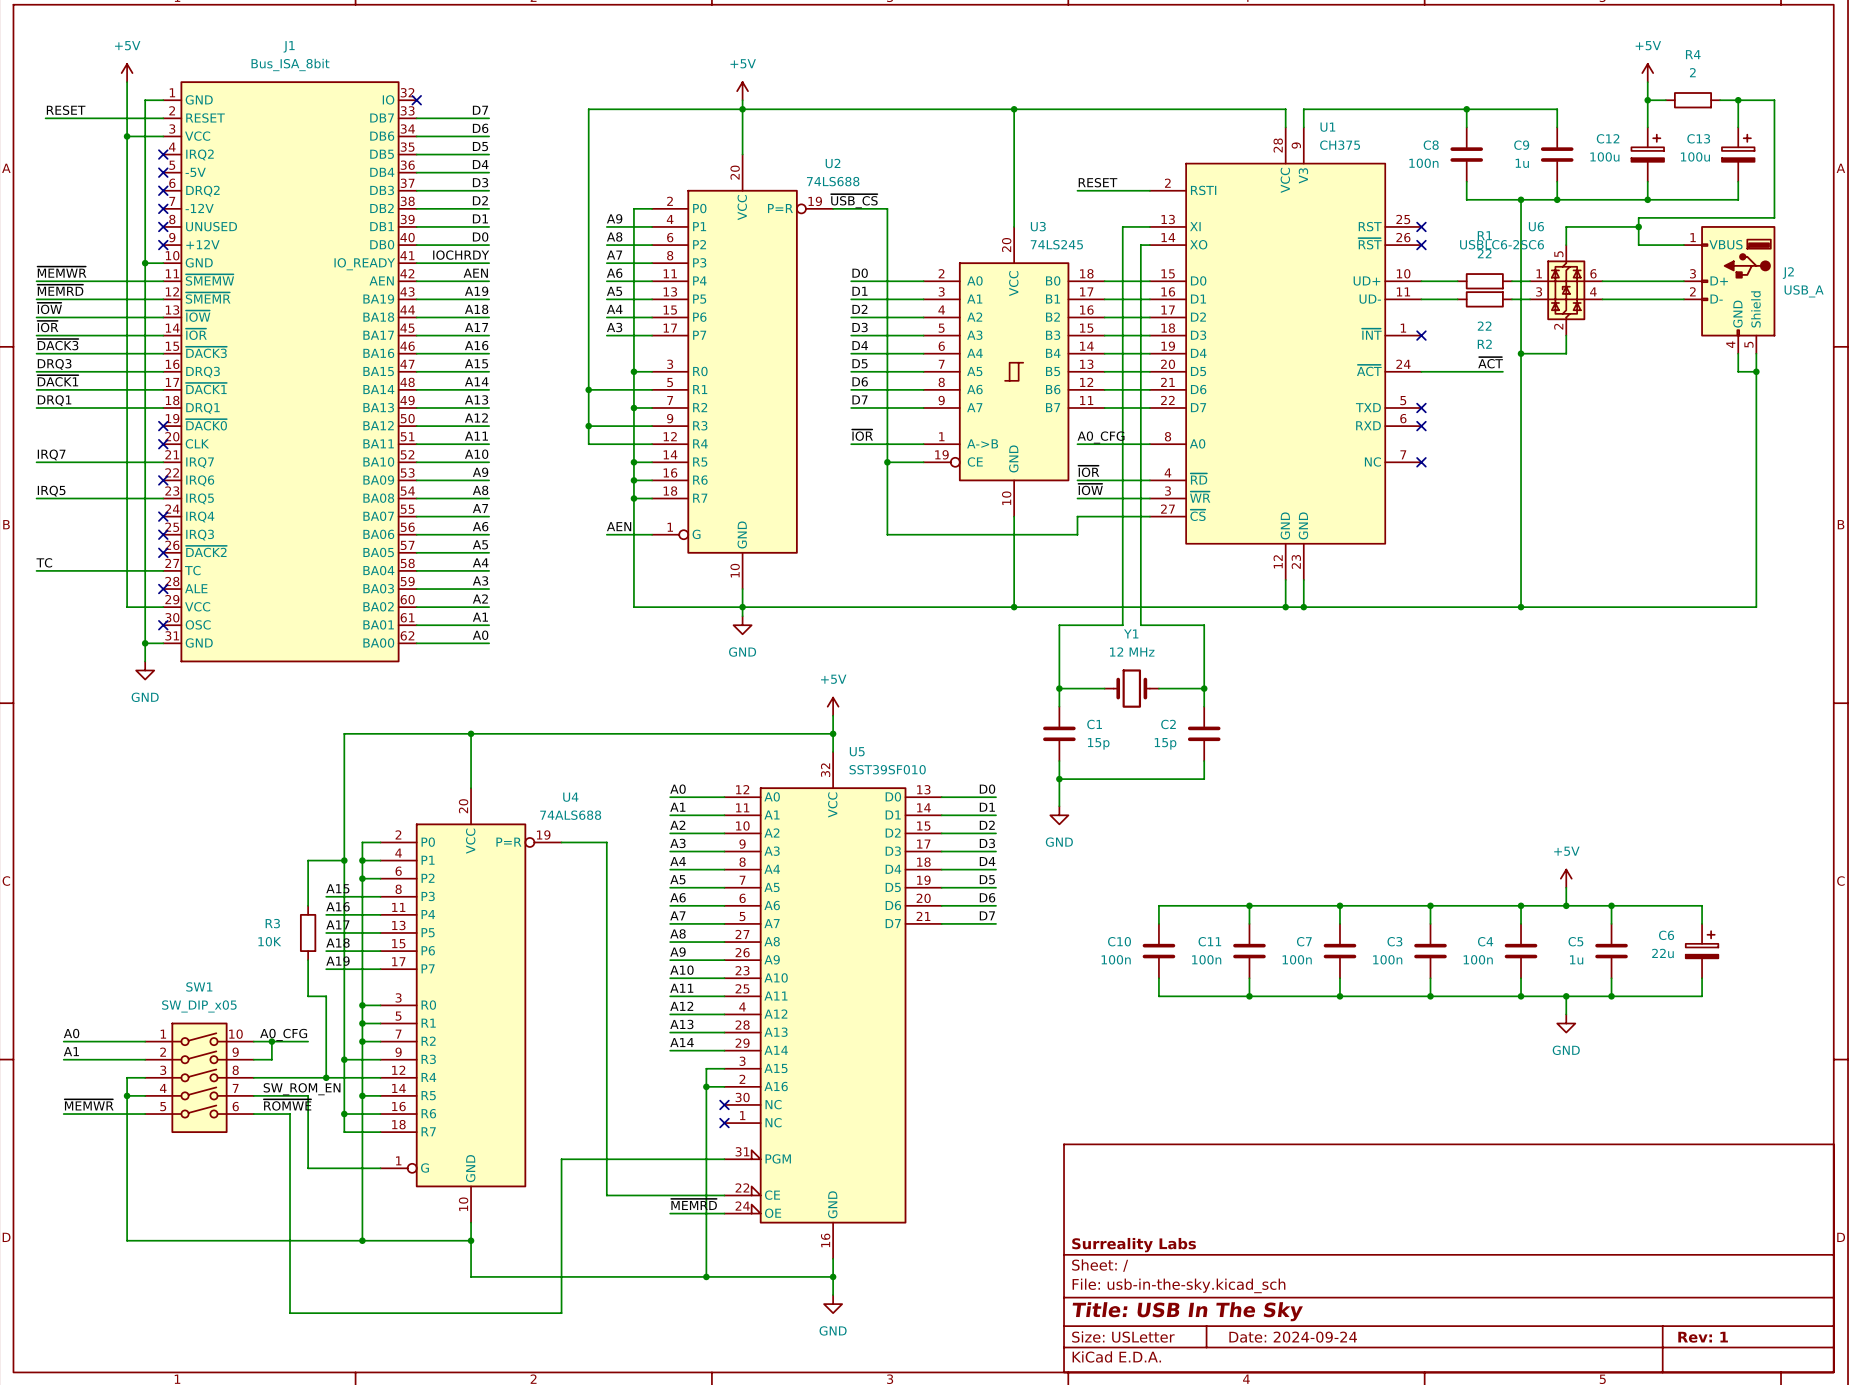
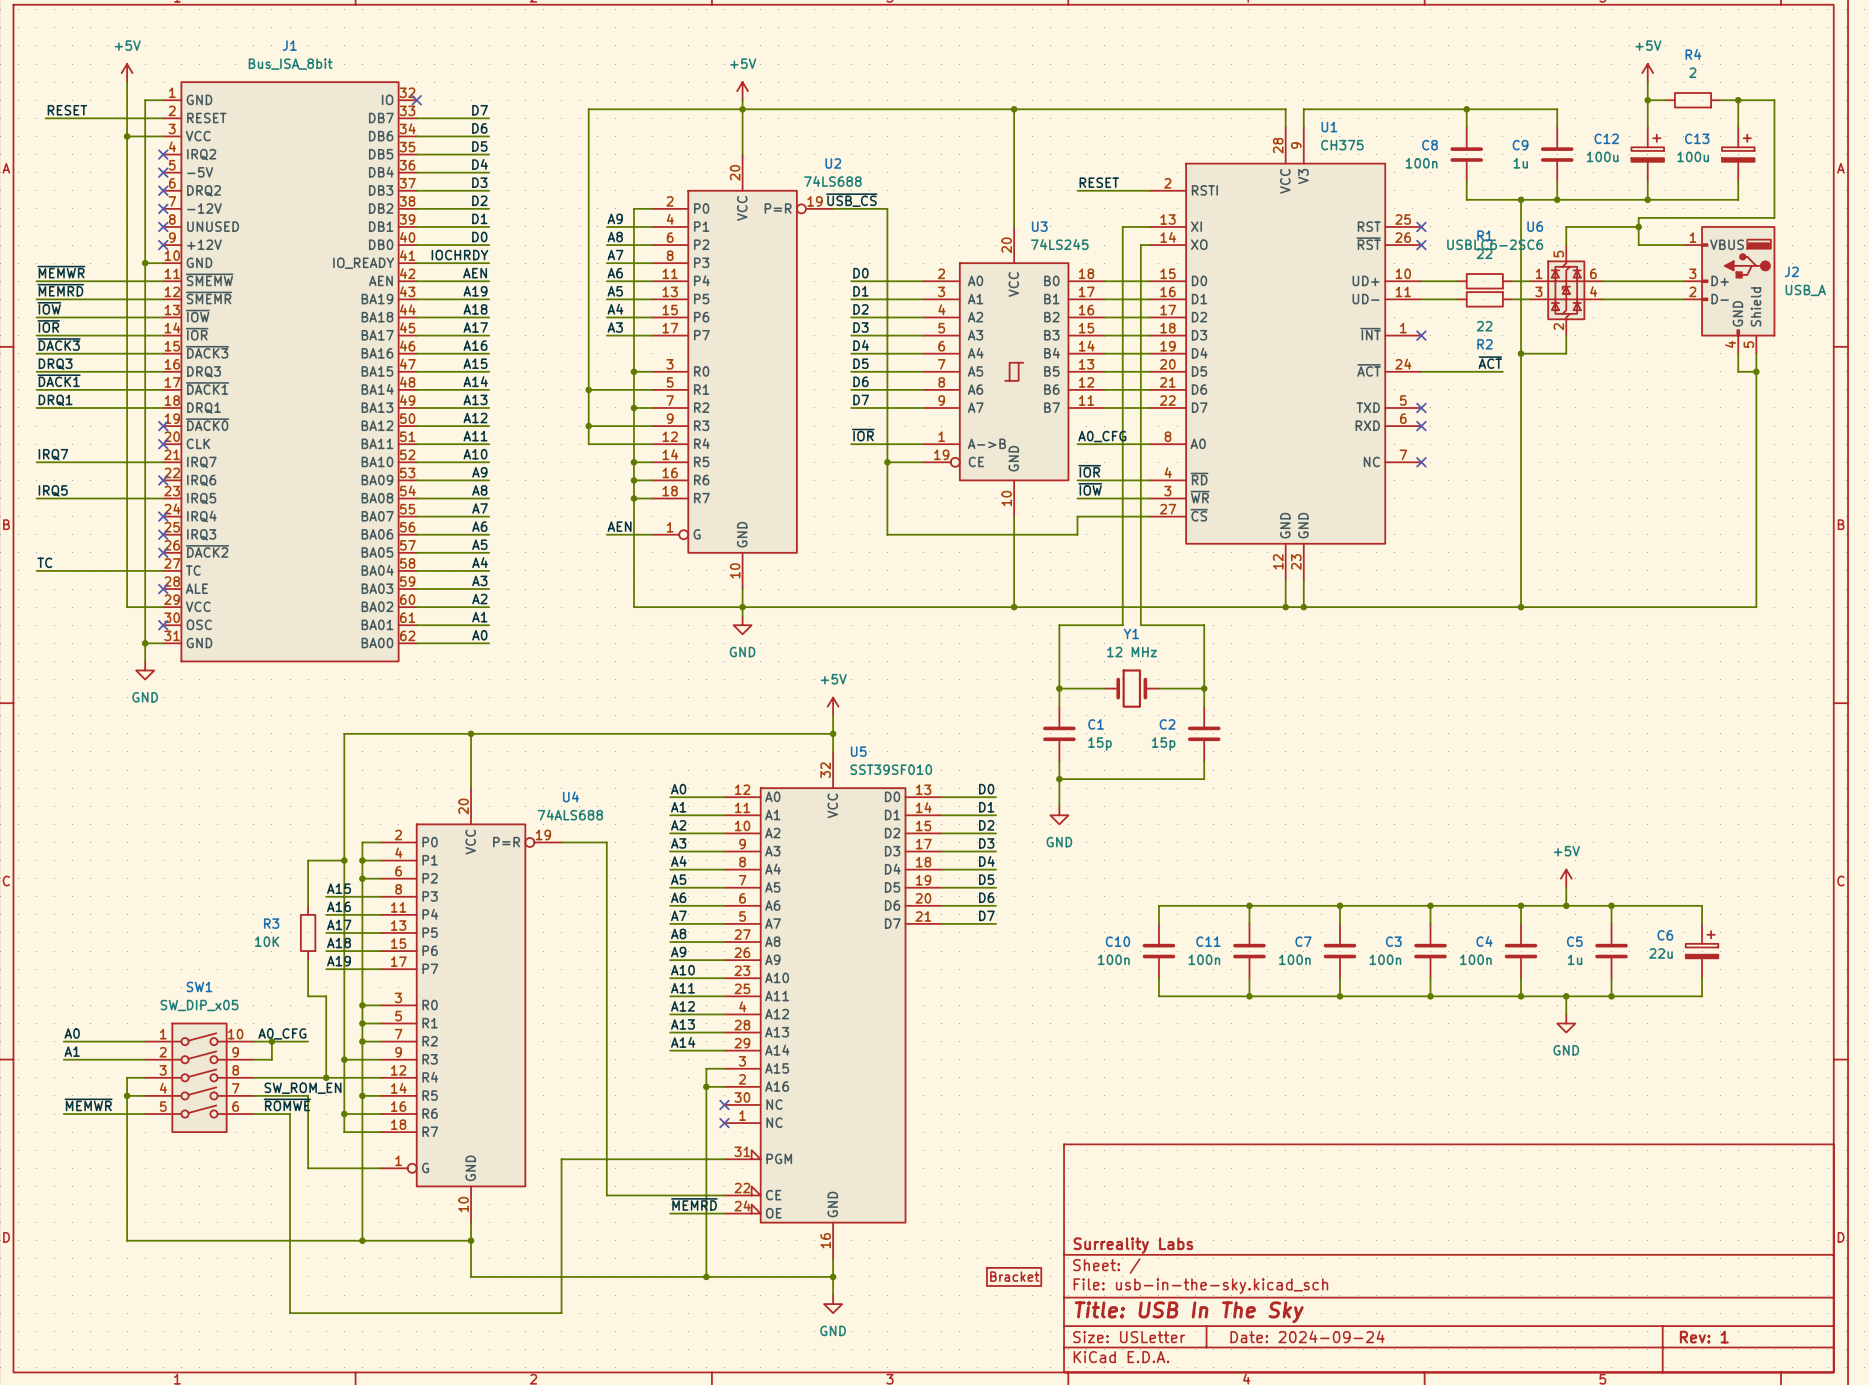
part: none -> (1014, 1276)

